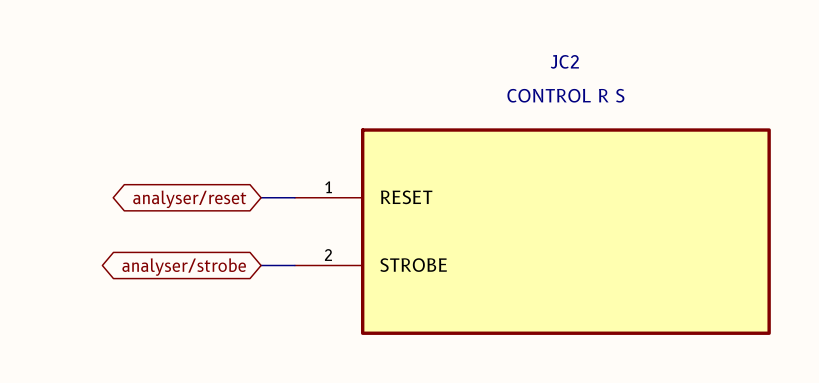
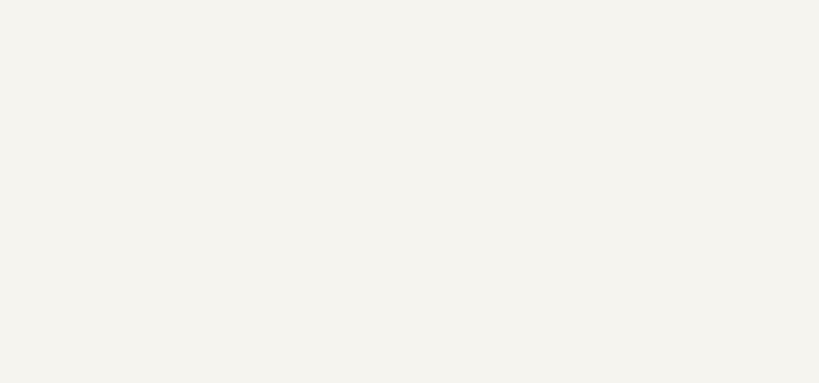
wire: (261, 197) (294, 197) -> none
global label: analyser/reset (189, 199) -> none
JC2: CONTROL R S (532, 231) -> none
wire: (261, 265) (294, 265) -> none
global label: analyser/strobe (184, 267) -> none

